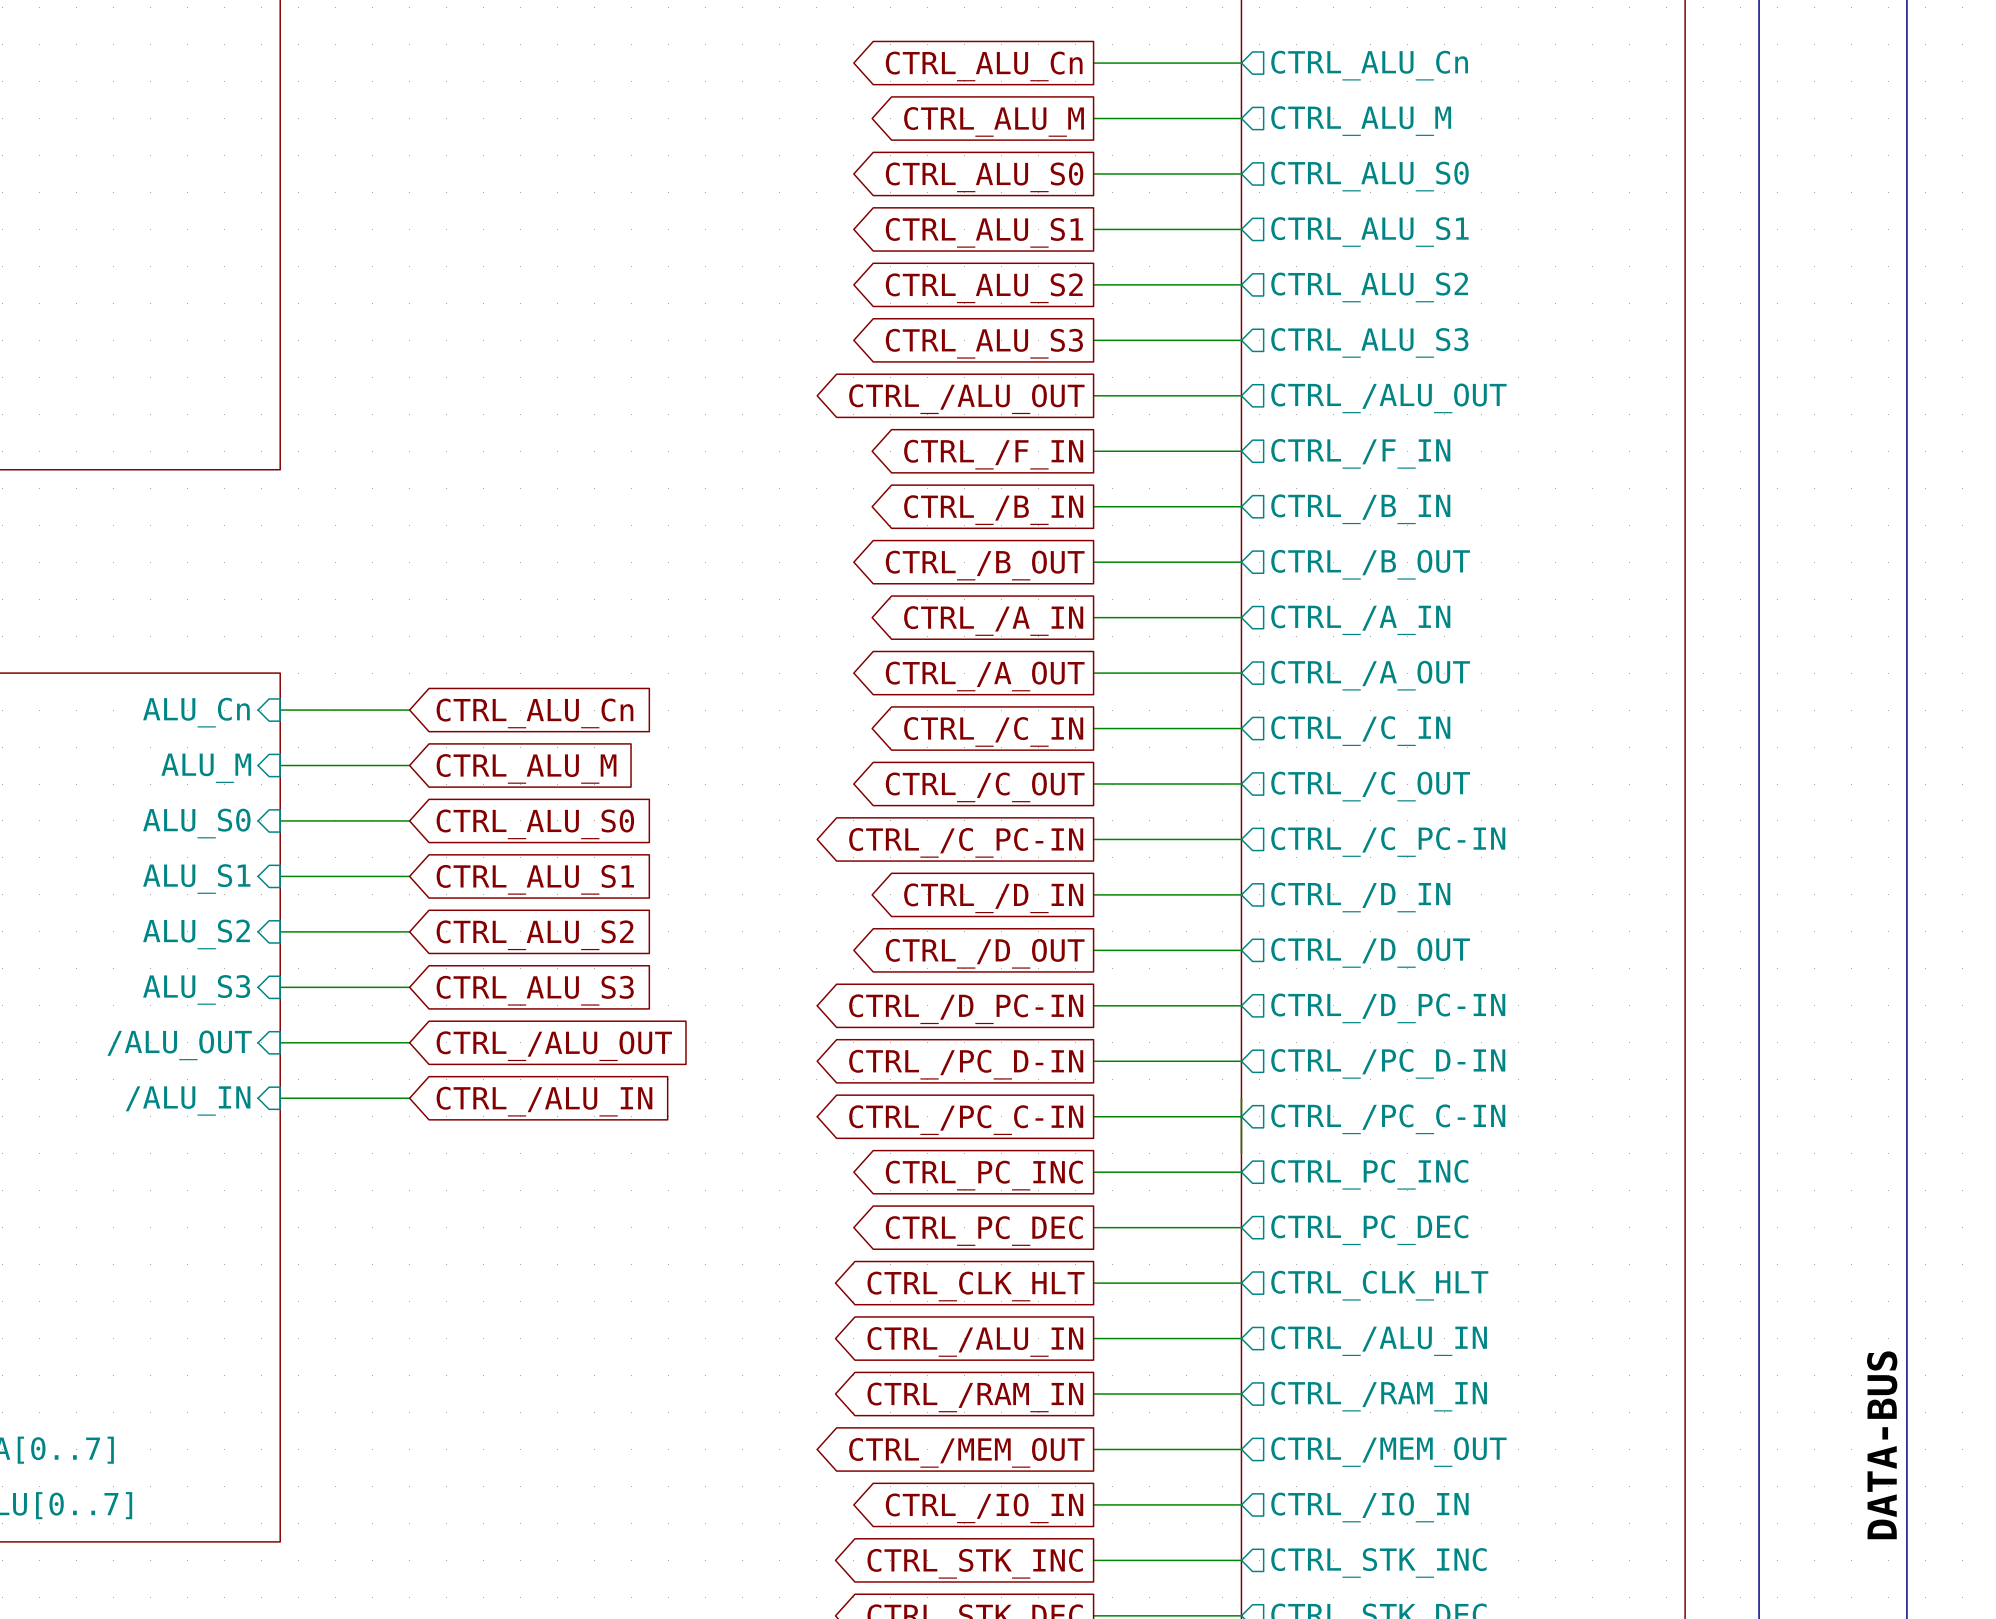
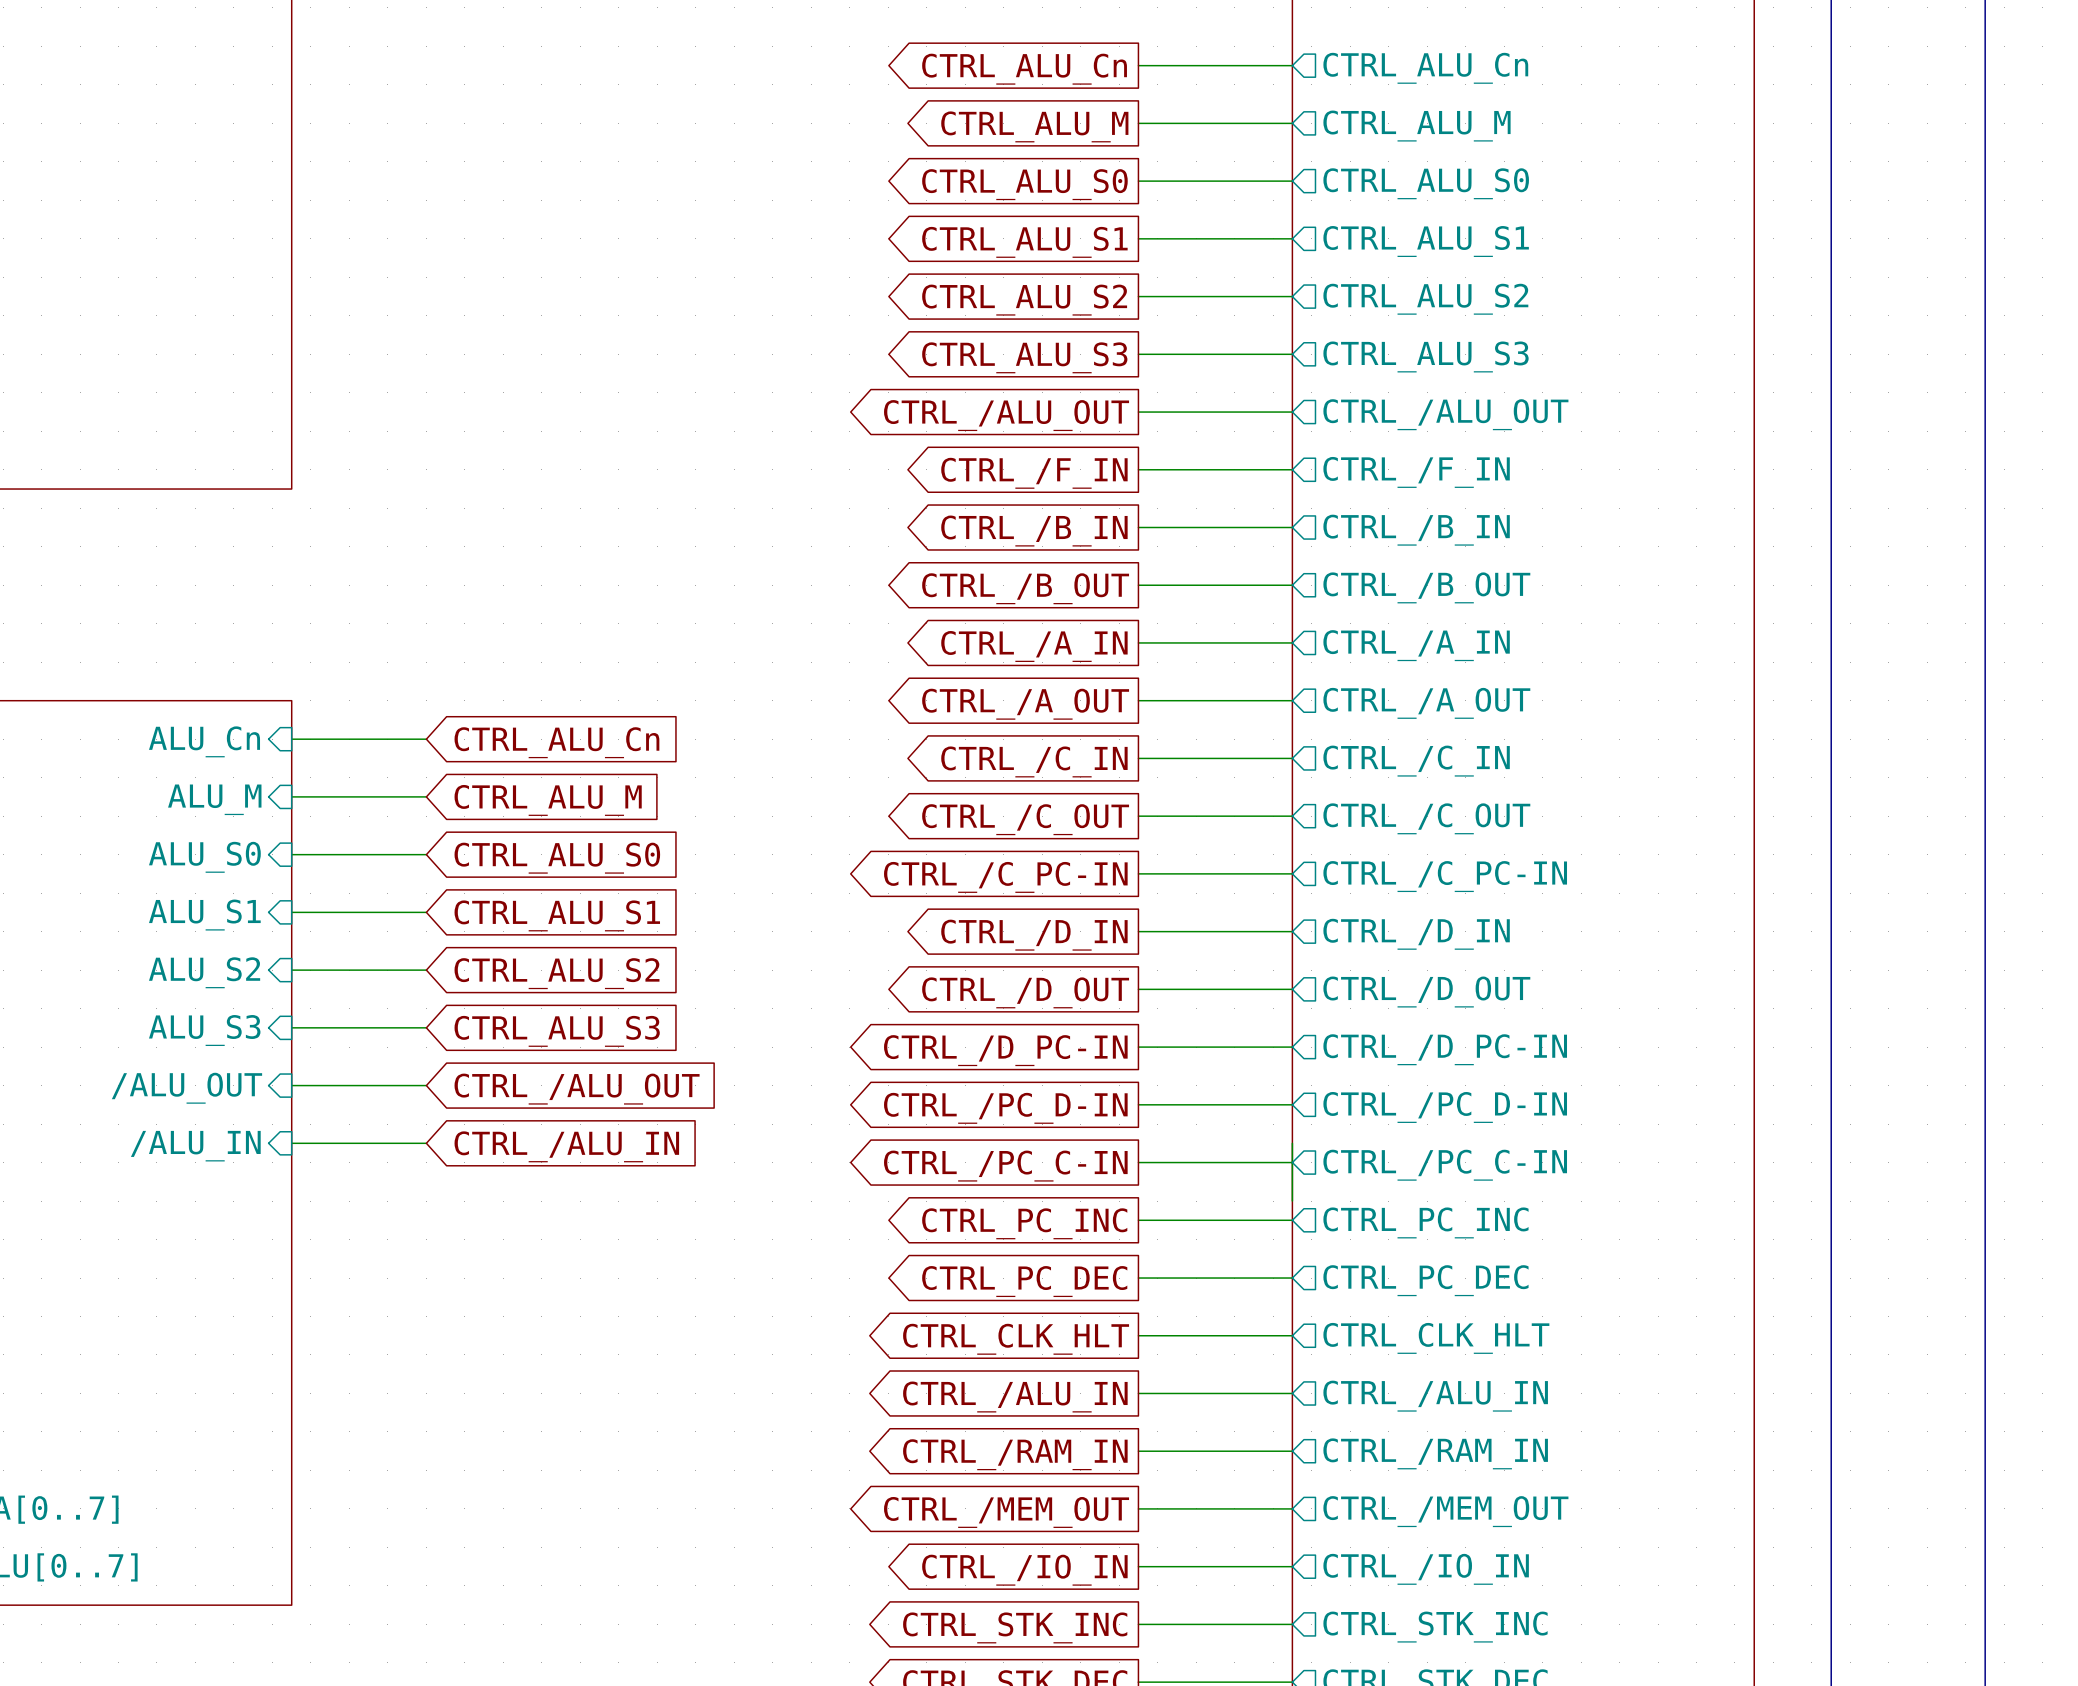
label: DATA-BUS (1882, 1445) -> none

